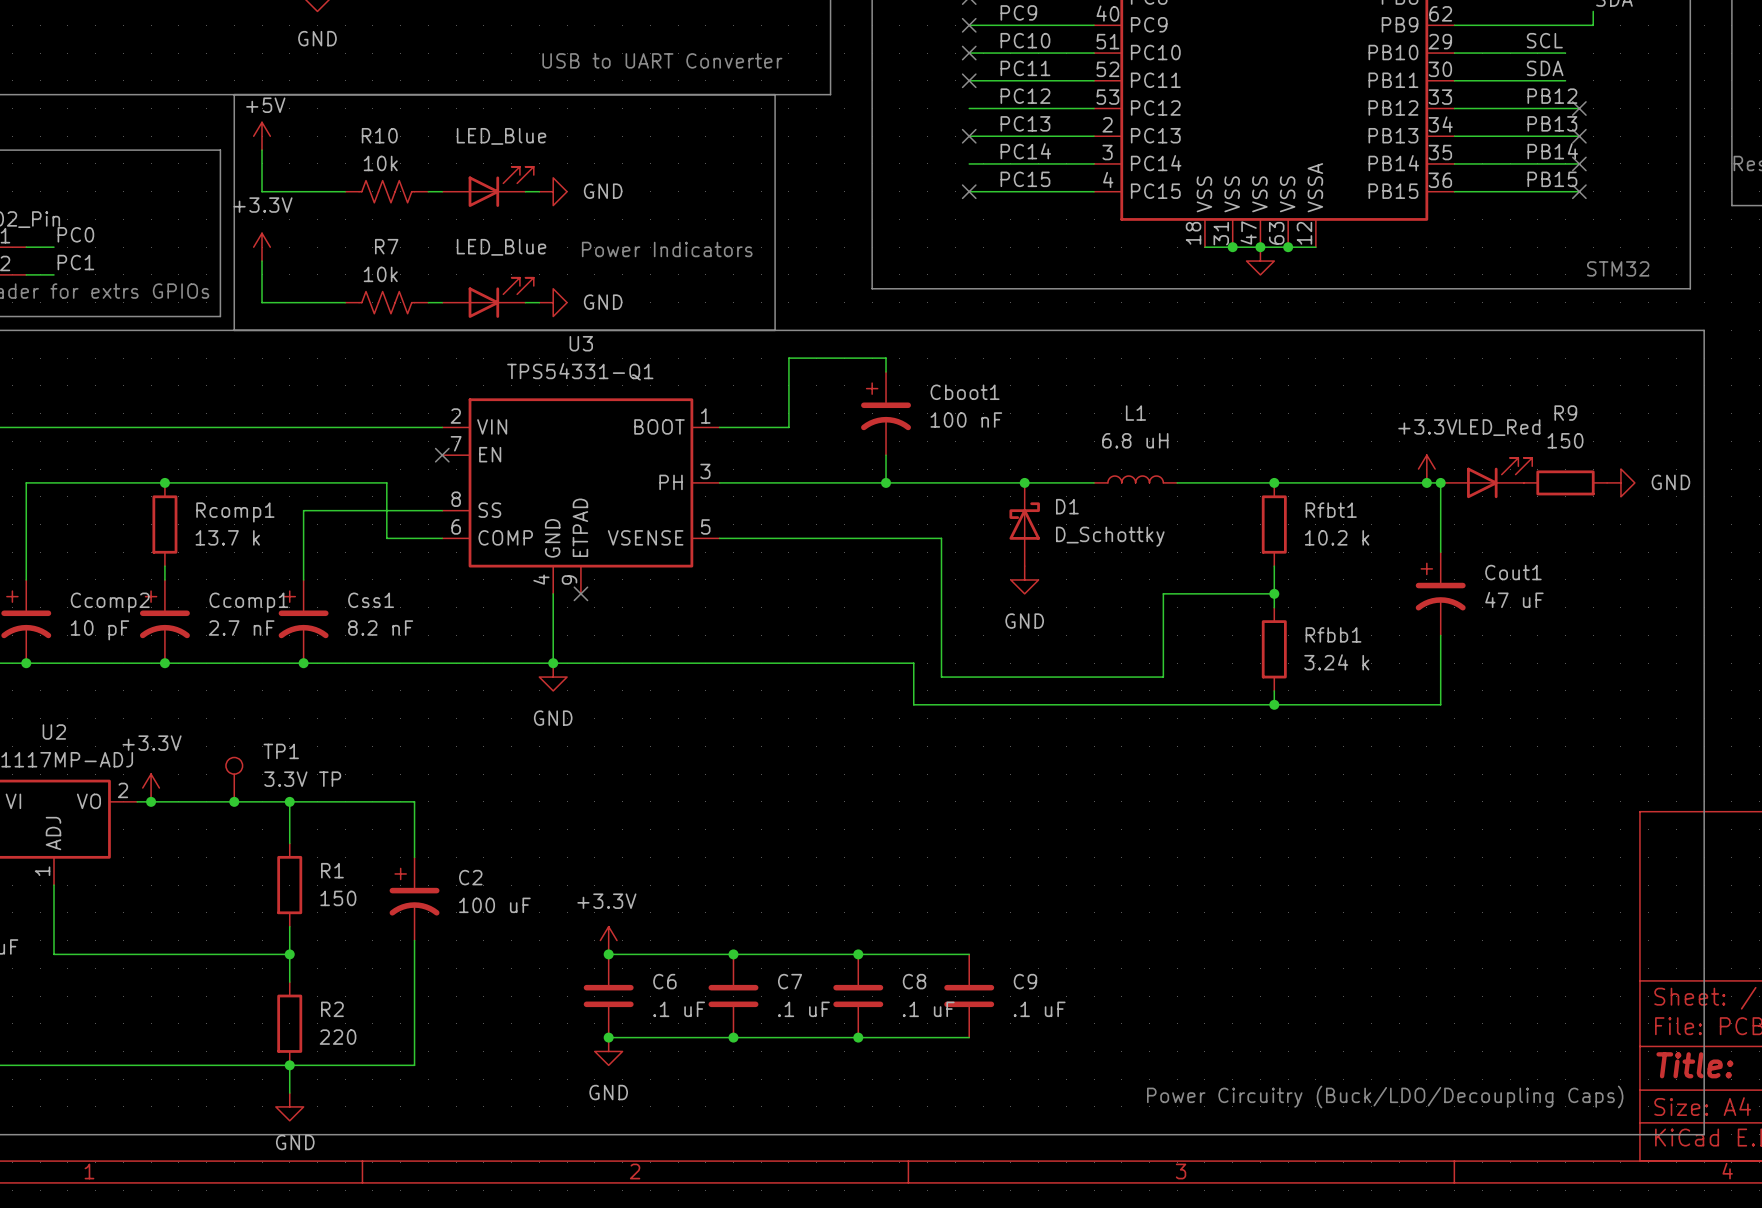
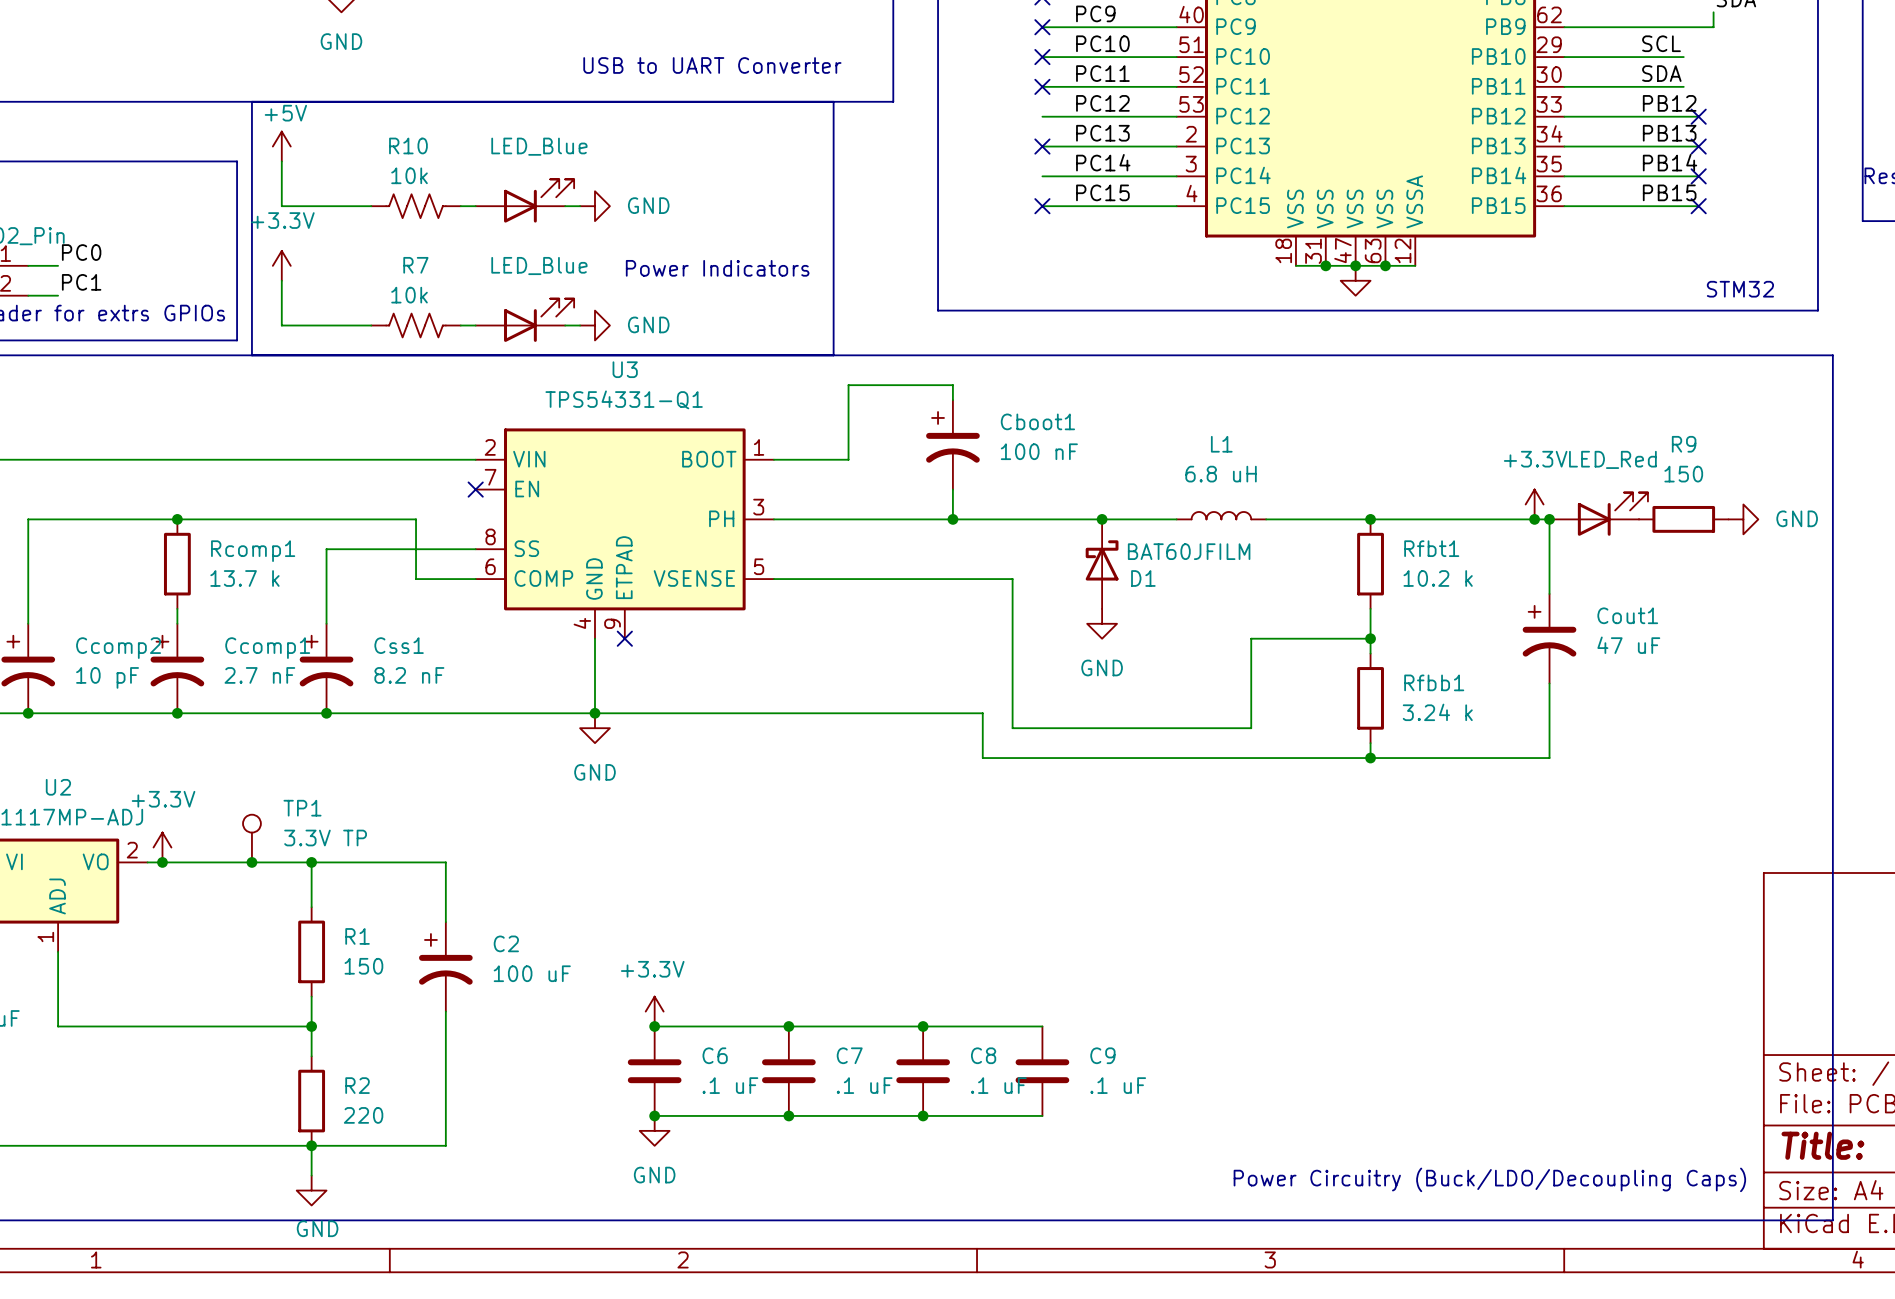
D1 name position: D1 (1067, 506) -> D1 (1143, 578)
D1 value: D_Schottky (1110, 536) -> BAT60JFILM (1189, 551)

